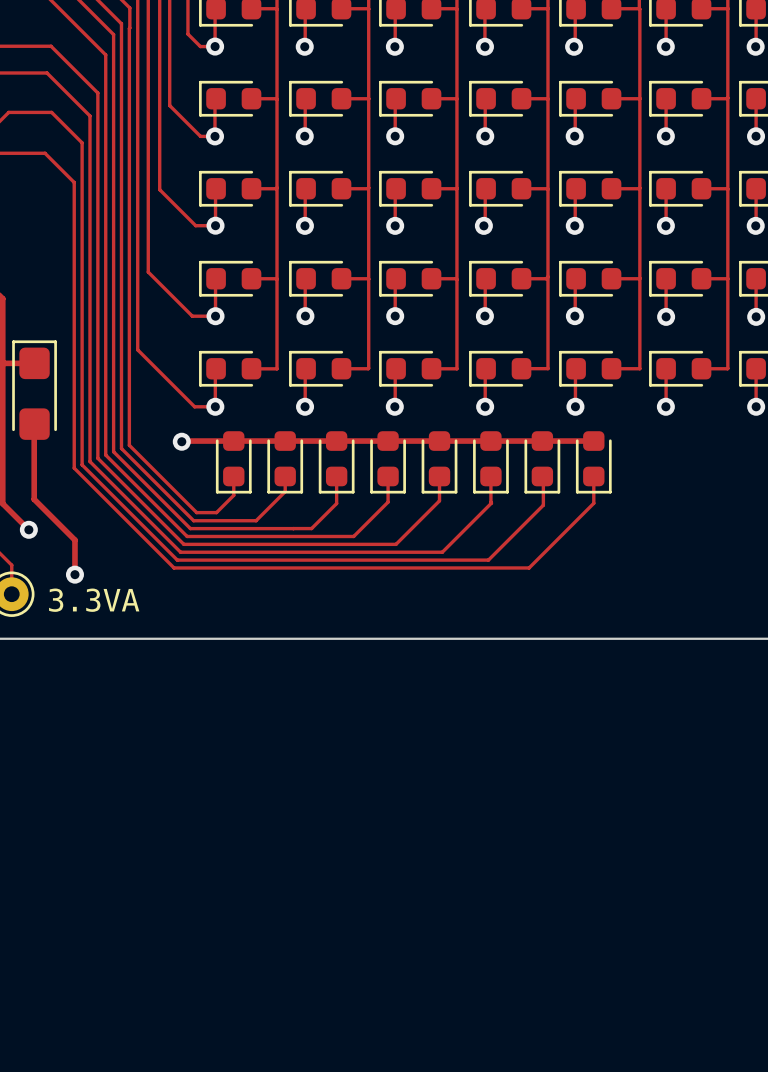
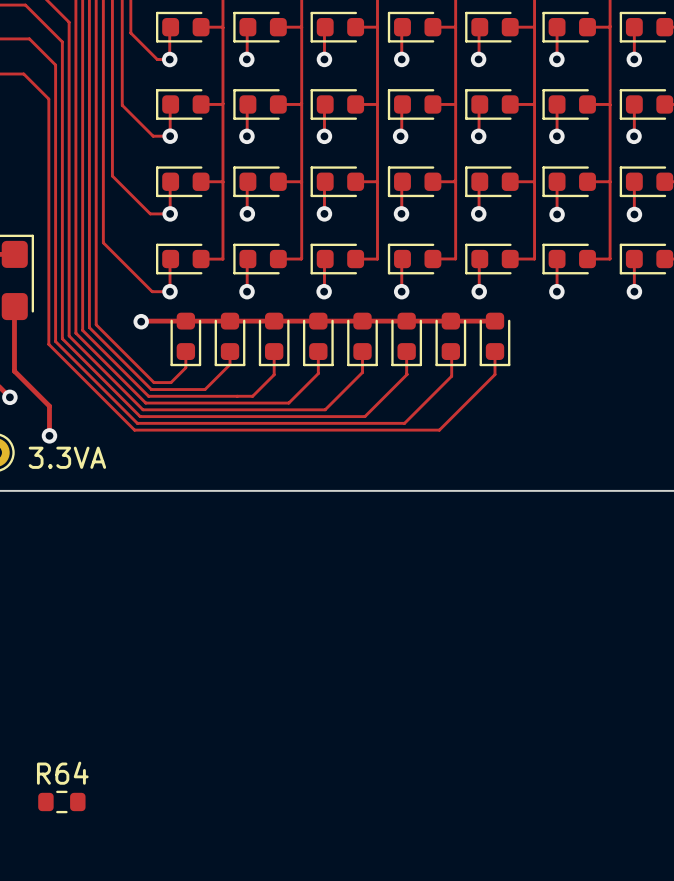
R64: none -> (61, 801)

